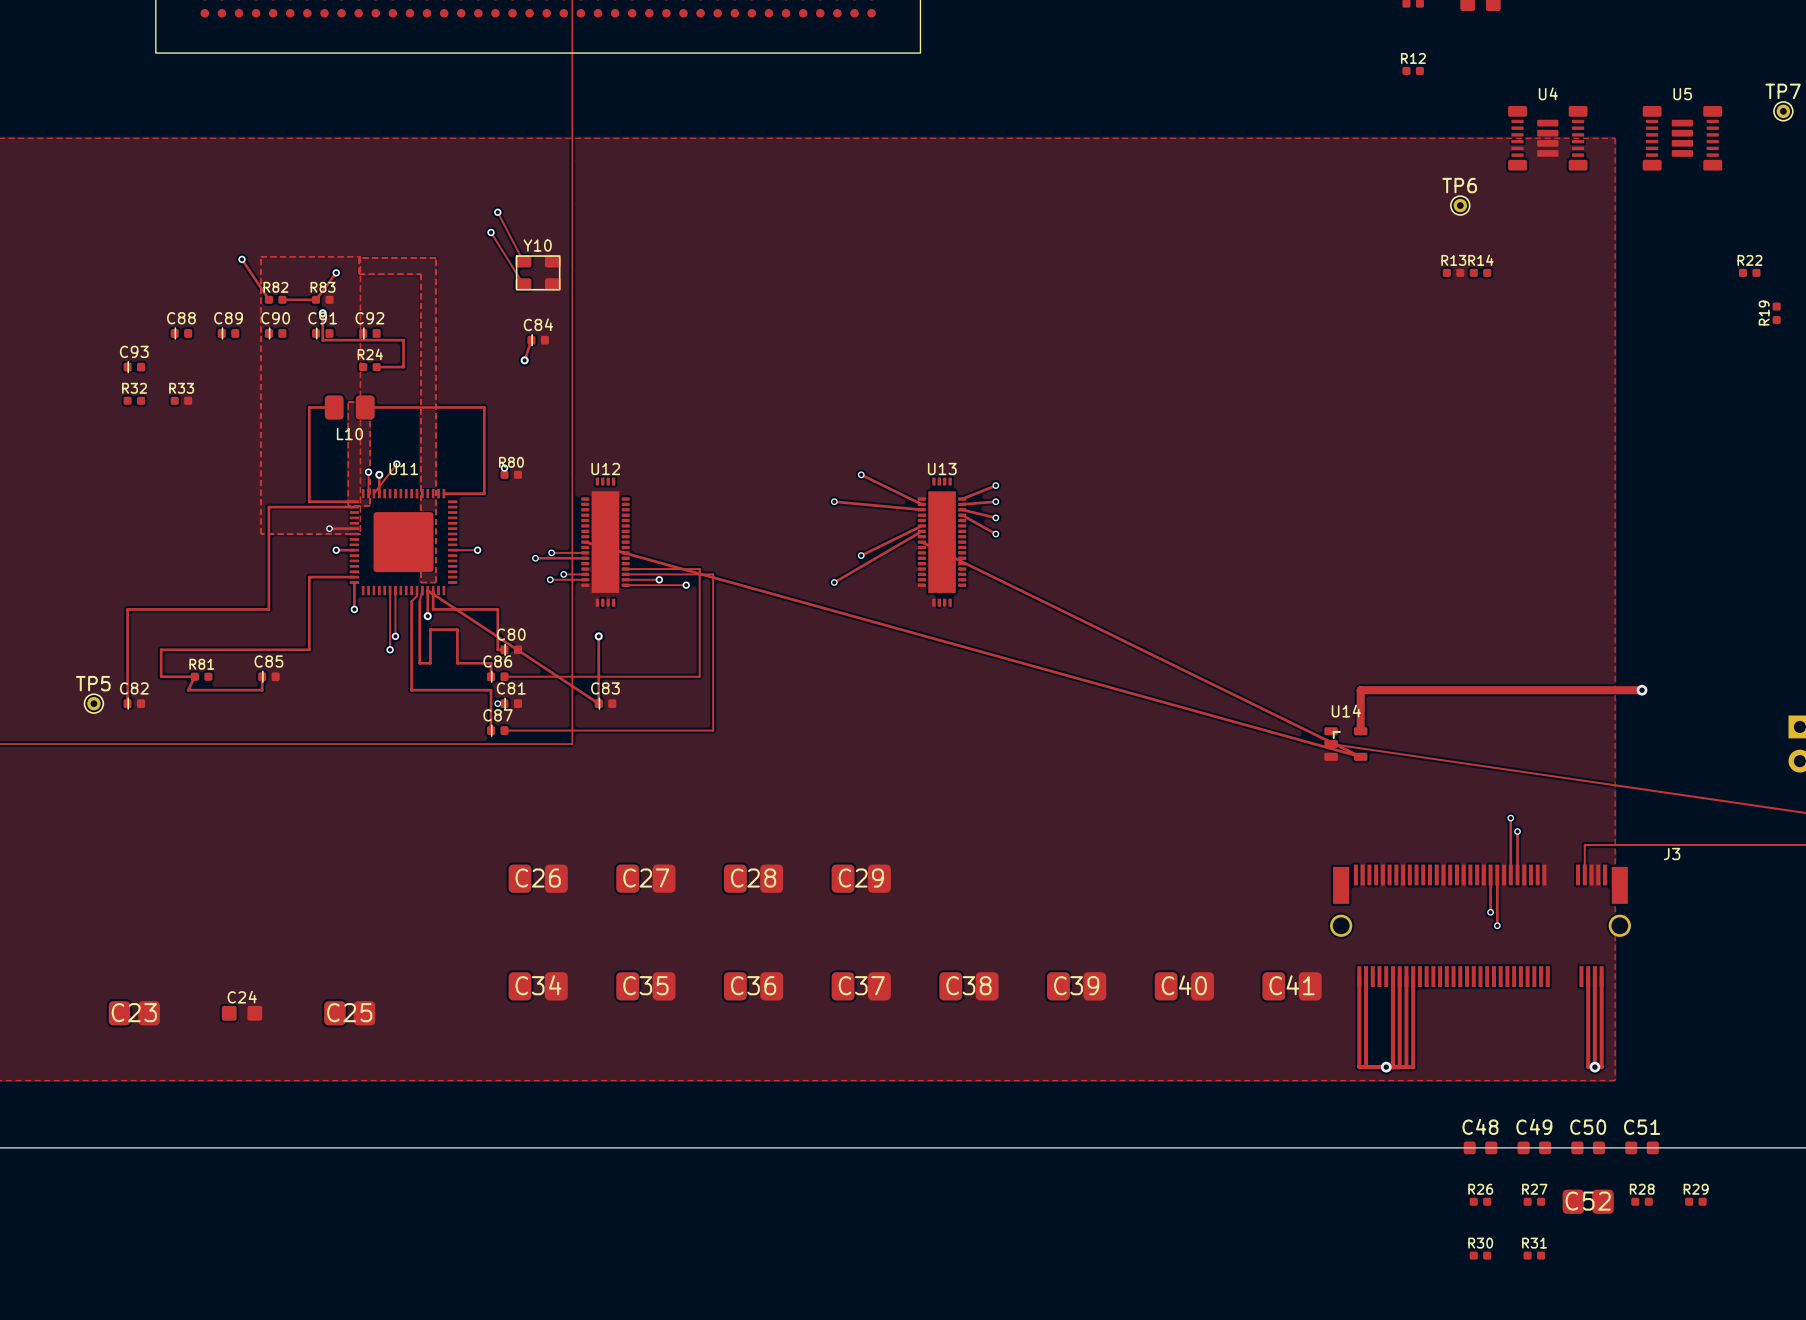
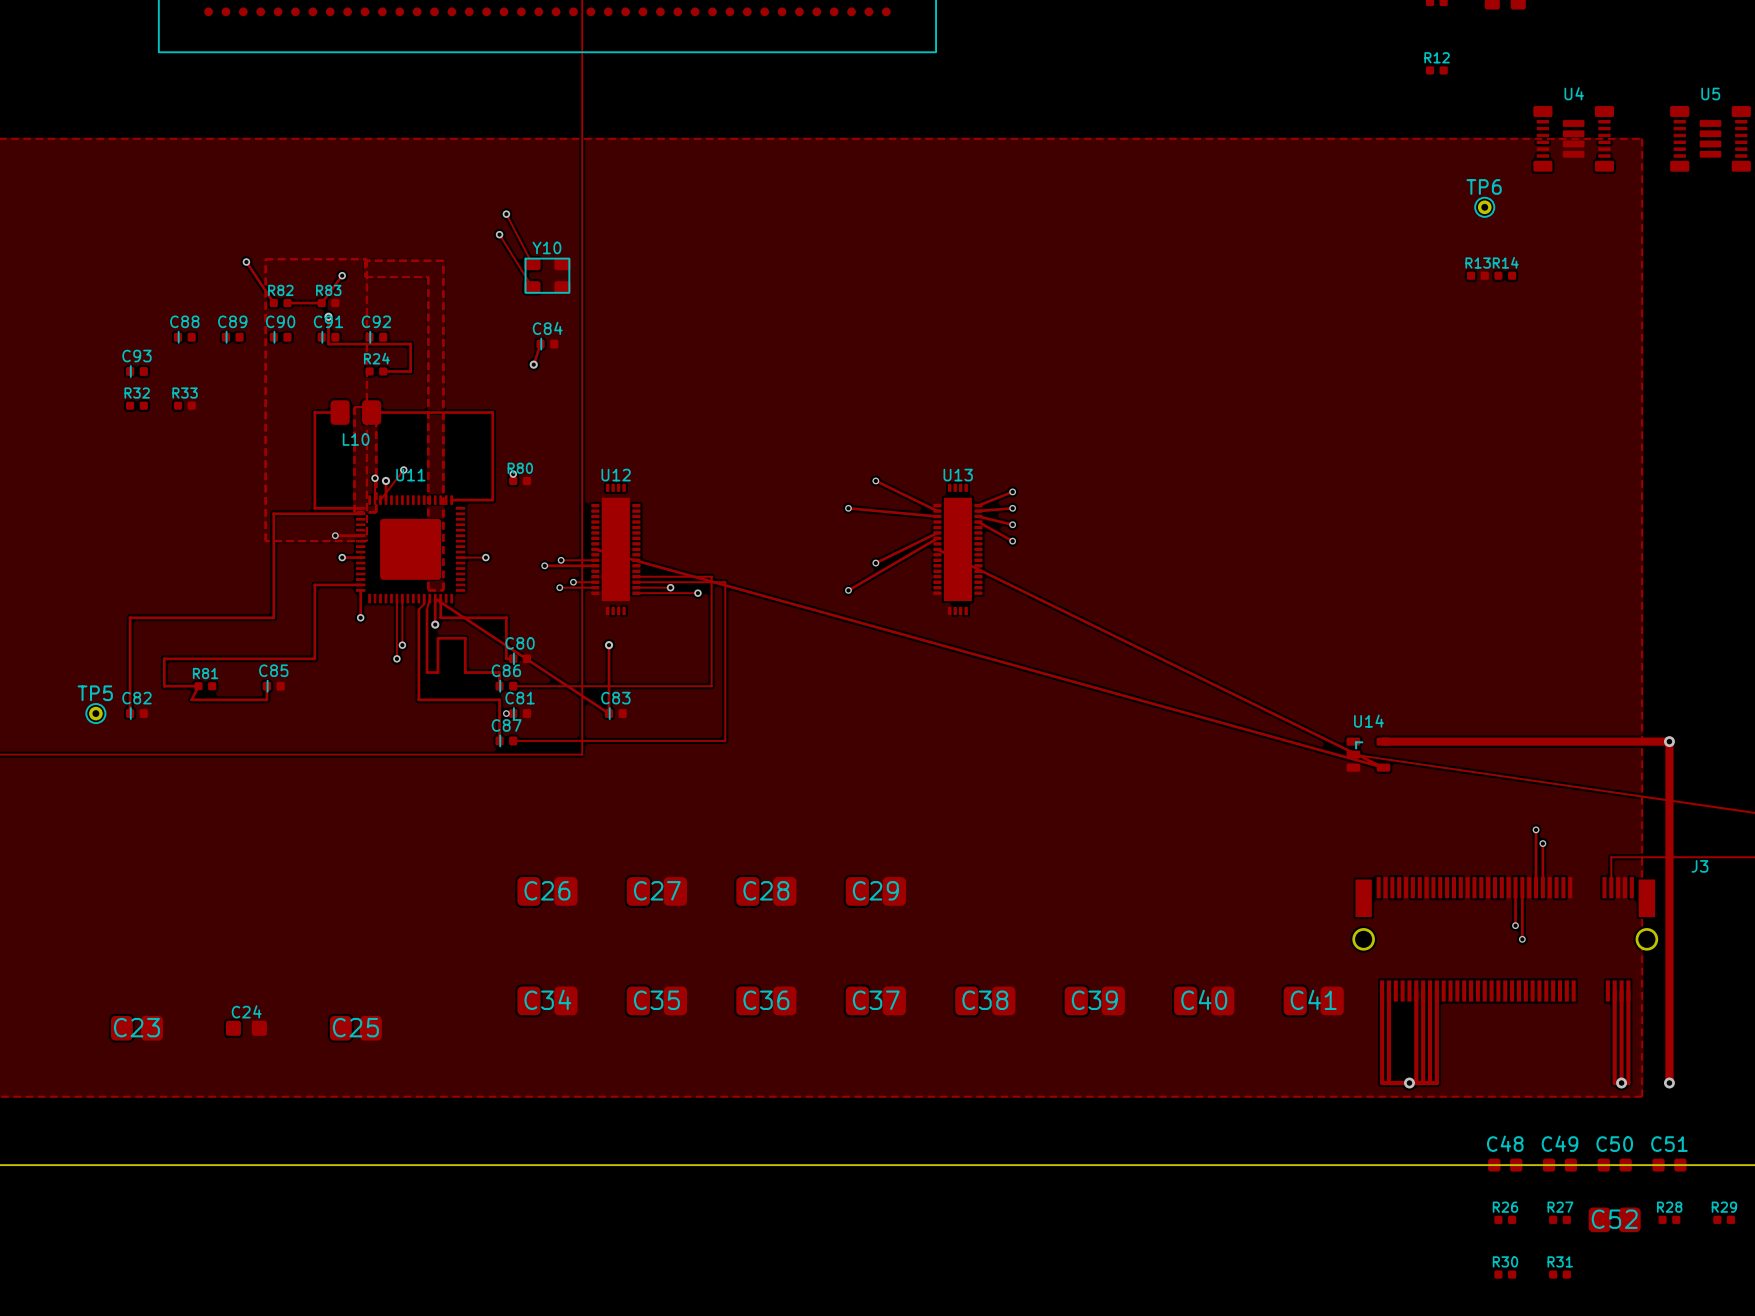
track: (1642, 690) (1360, 690) (1360, 731) -> (1669, 1083) (1669, 741) (1383, 741)
via position: (1642, 690) -> (1669, 741)
via: none -> (1669, 1083)

